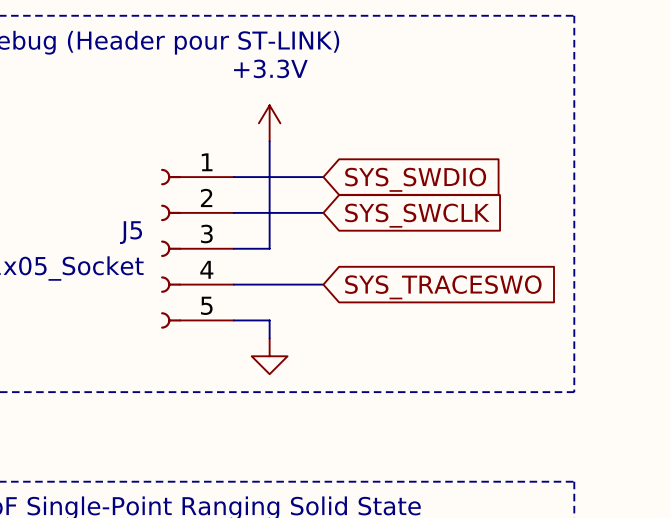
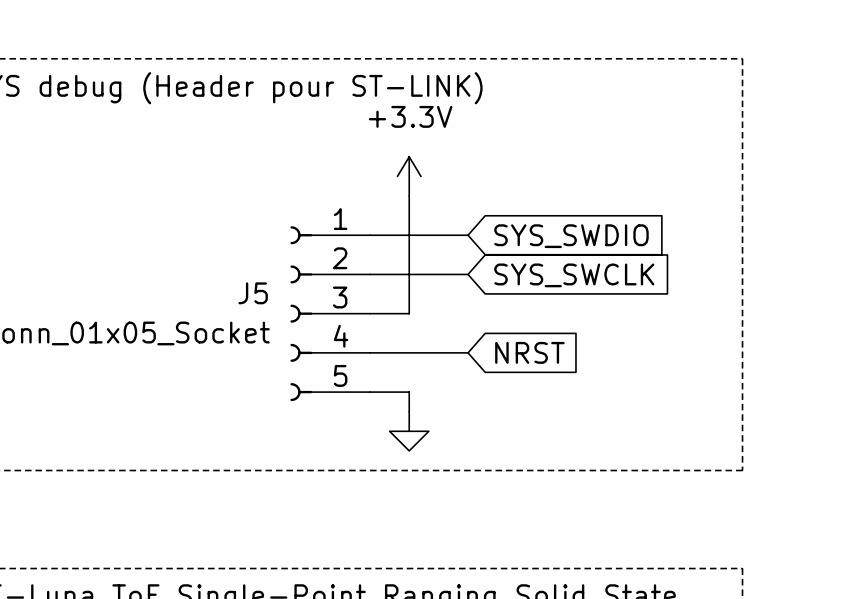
global label: SYS_TRACESWO (443, 287) -> NRST (529, 352)

